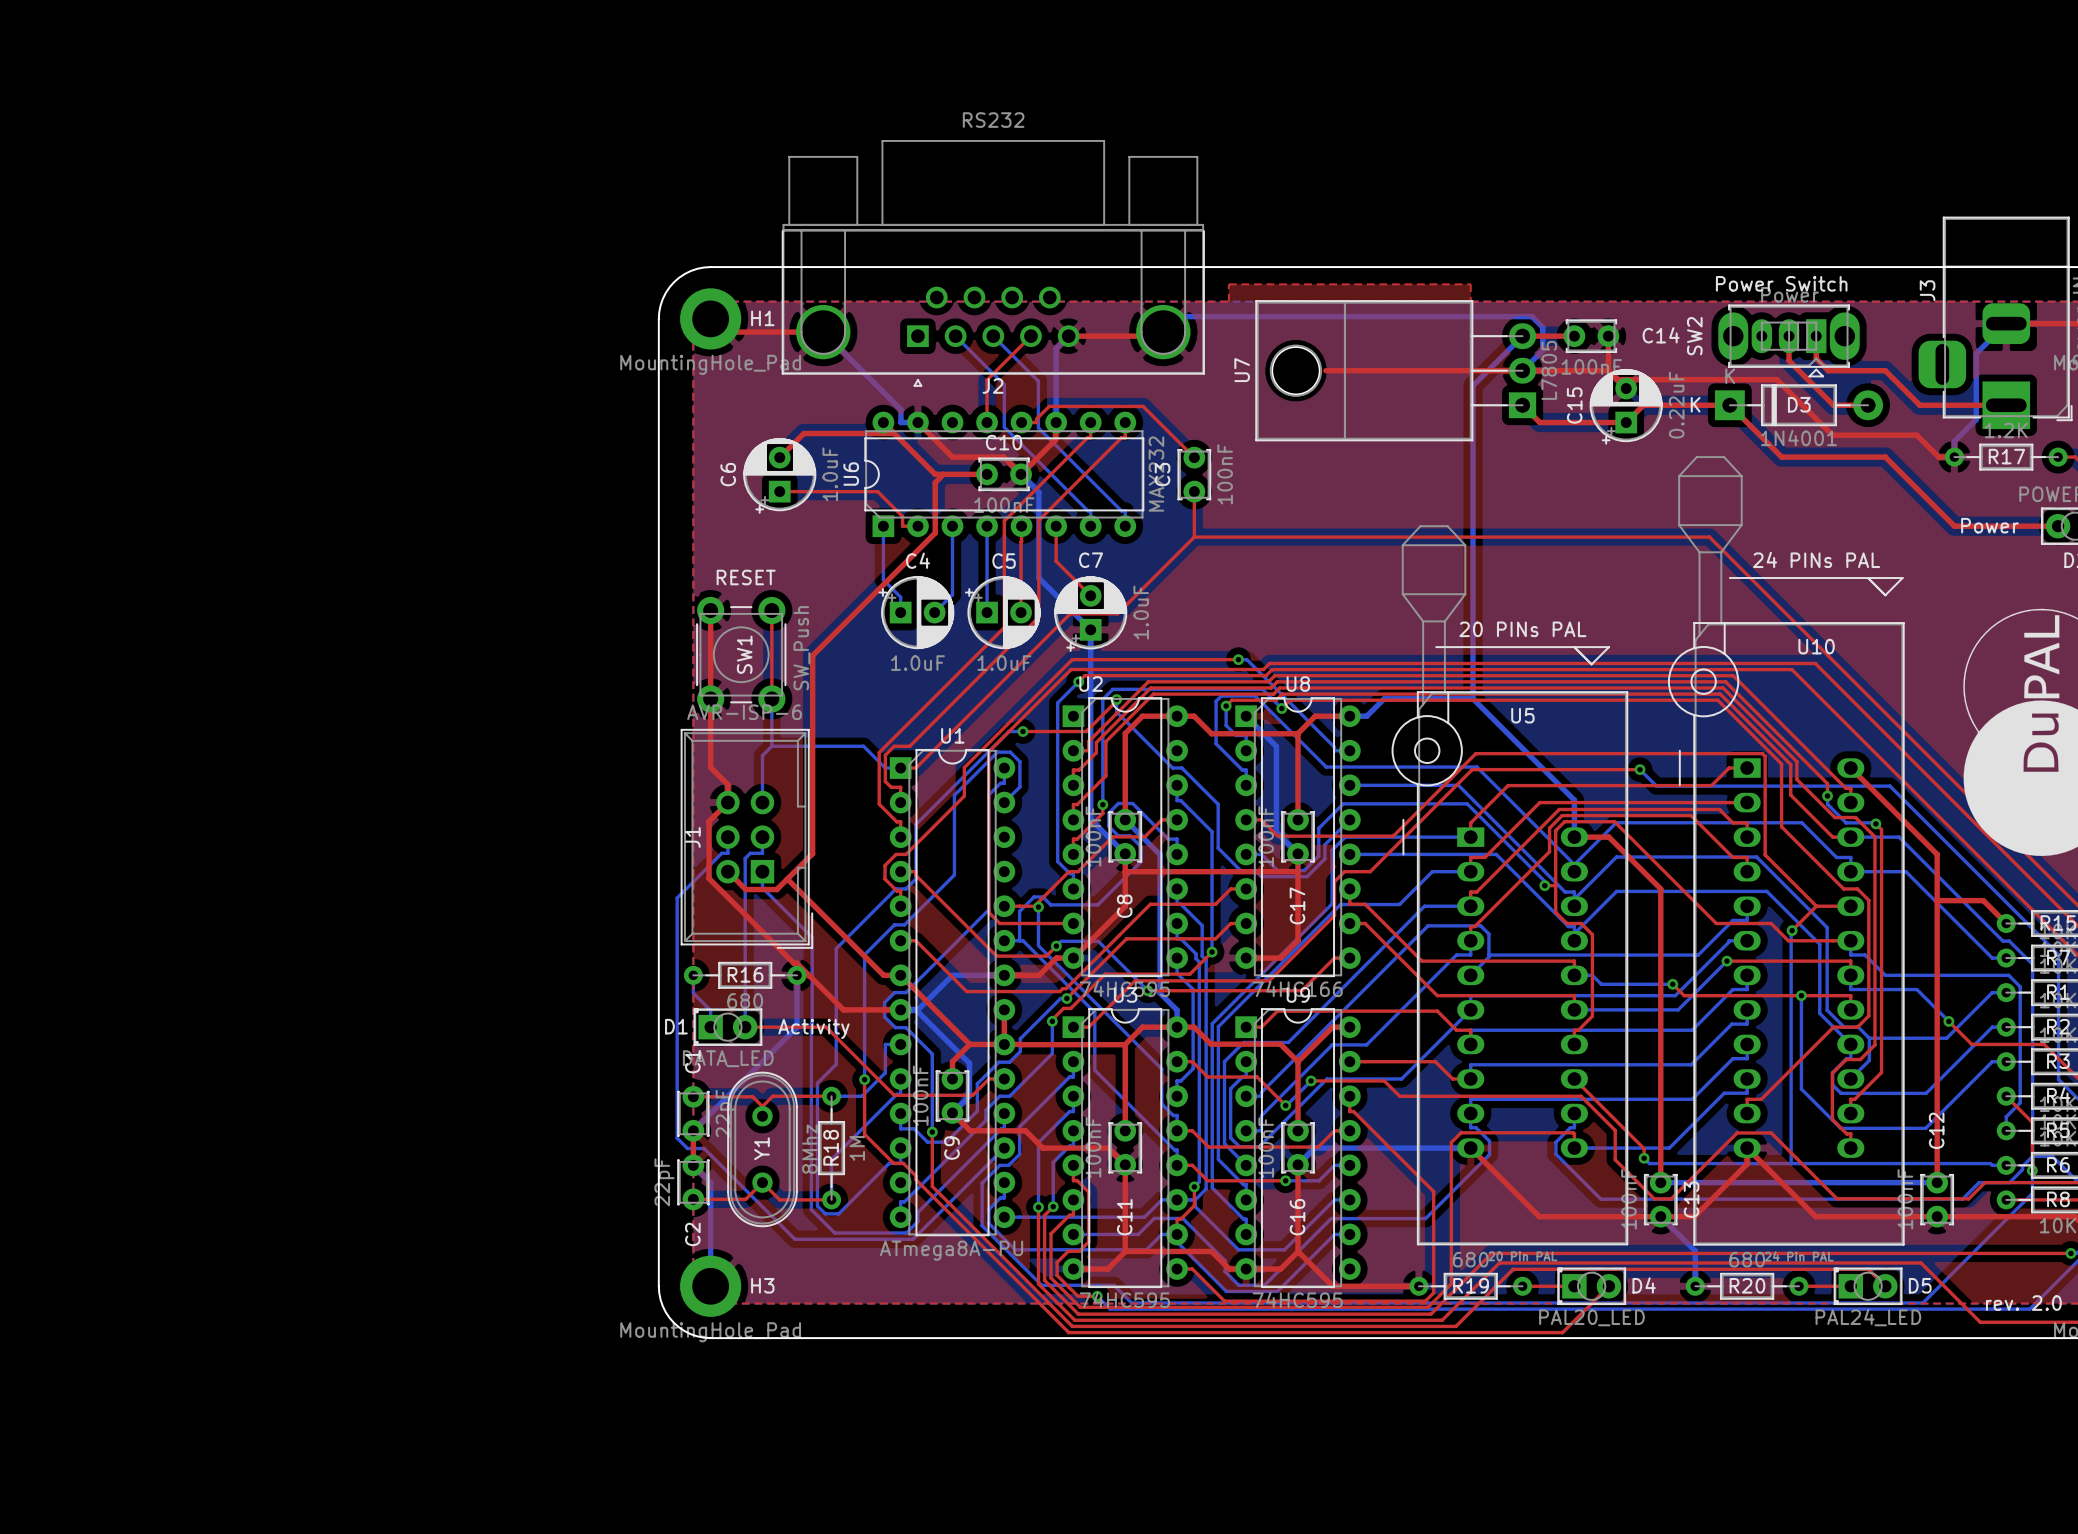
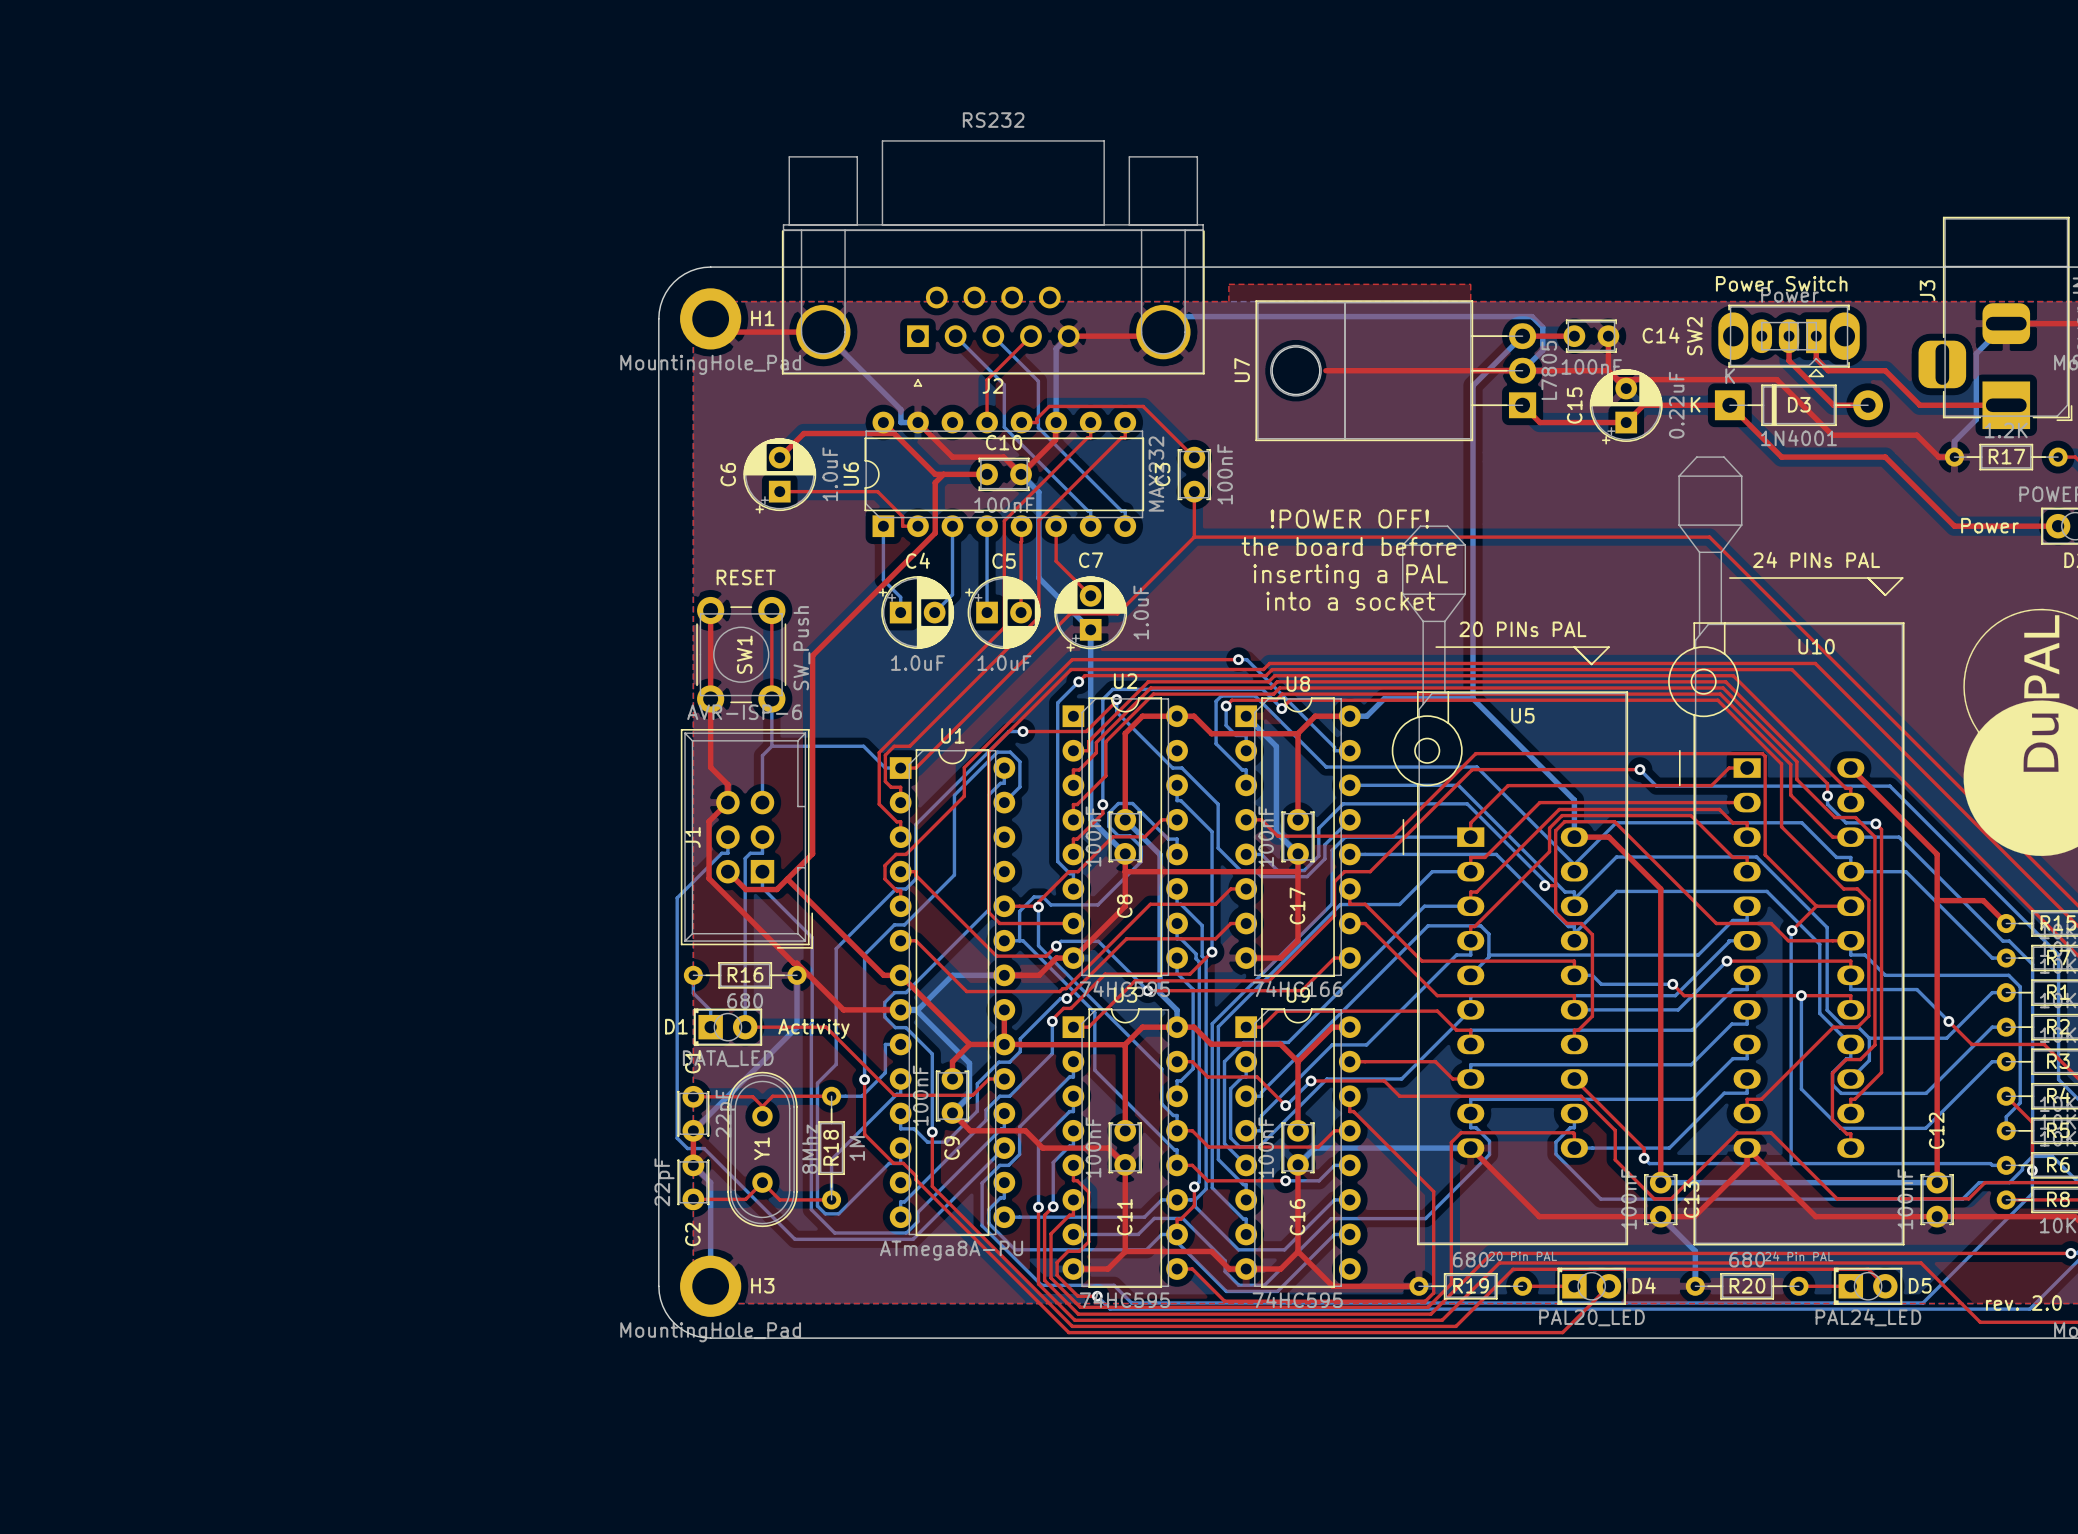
text: none -> !POWER OFF! (1349, 519)
text: none -> the board before (1349, 546)
text: none -> inserting a PAL (1350, 576)
text: none -> into a socket (1350, 601)
U2 name position: U2 (1091, 684) -> U2 (1125, 681)

